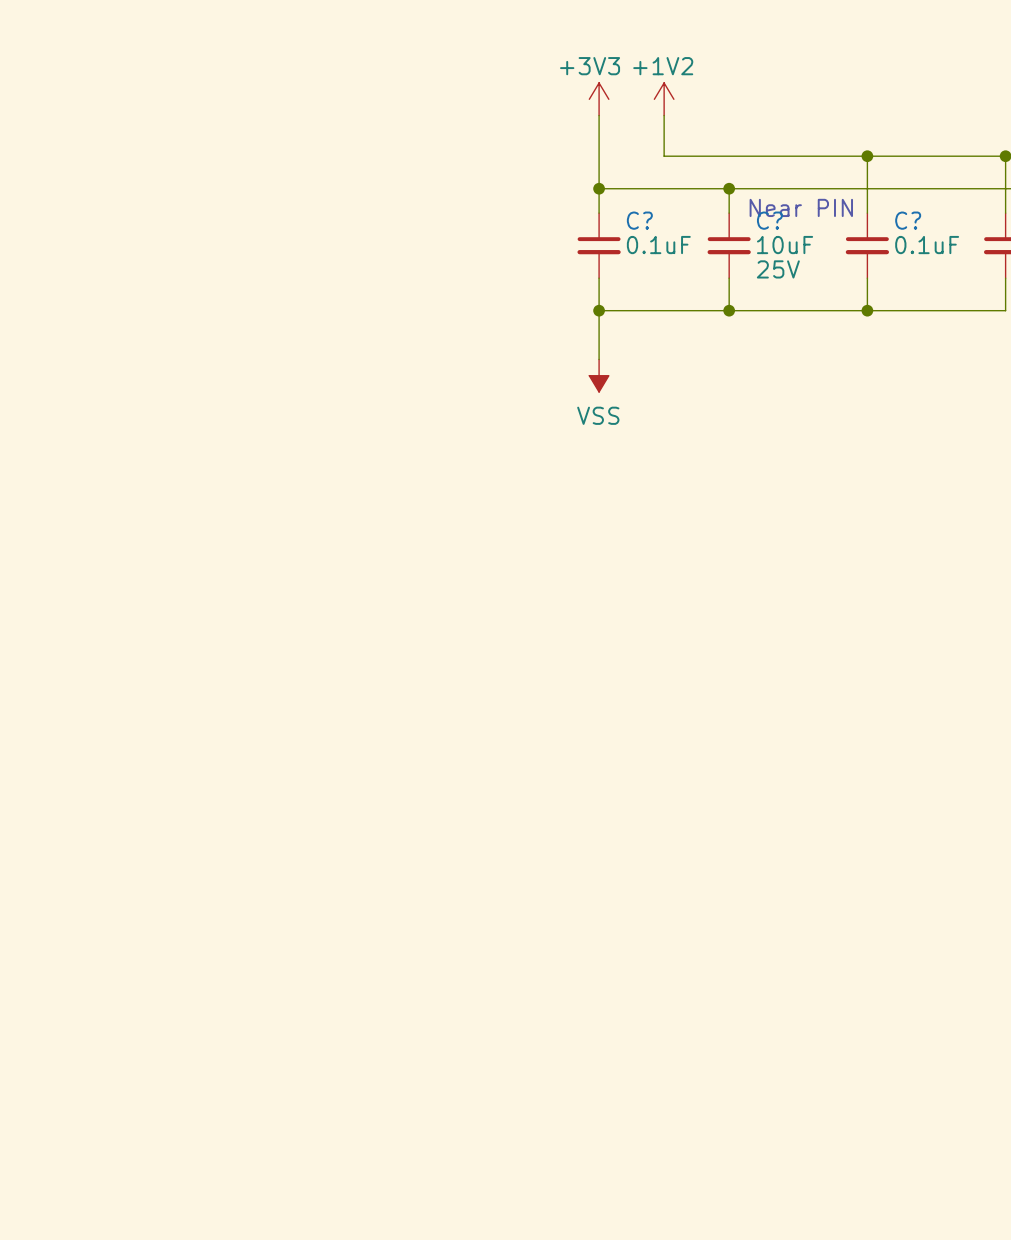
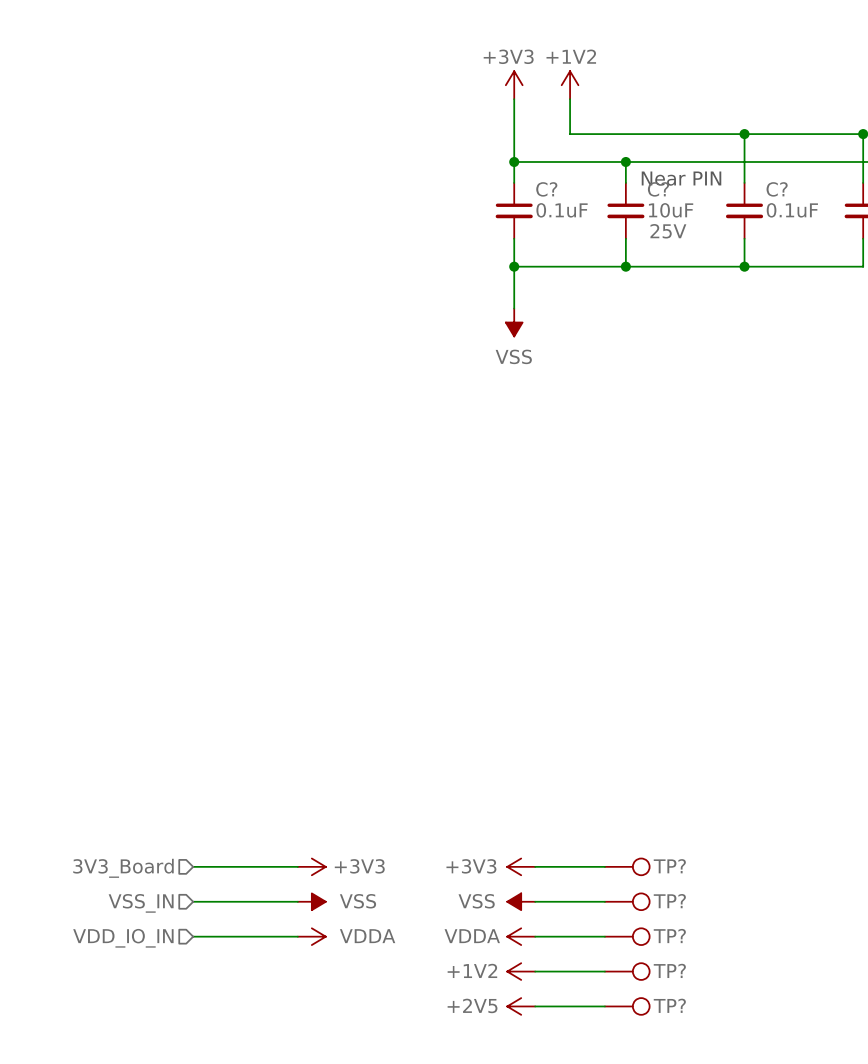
wire: none -> (193, 866) (297, 866)
power symbol: none -> +3V3 (311, 866)
power symbol: none -> +3V3 (521, 866)
wire: none -> (535, 866) (604, 866)
TP?: none -> (627, 866)
hierarchical label: none -> 3V3_Board (123, 868)
hierarchical label: none -> VSS_IN (141, 903)
wire: none -> (193, 901) (297, 901)
power symbol: none -> VSS (311, 901)
power symbol: none -> VSS (521, 901)
wire: none -> (535, 901) (604, 901)
TP?: none -> (627, 901)
hierarchical label: none -> VDD_IO_IN (123, 938)
wire: none -> (193, 936) (297, 936)
power symbol: none -> VDDA (311, 936)
power symbol: none -> VDDA (521, 936)
wire: none -> (535, 936) (604, 936)
TP?: none -> (627, 936)
power symbol: none -> +1V2 (521, 971)
wire: none -> (535, 971) (604, 971)
TP?: none -> (627, 971)
power symbol: none -> +2V5 (521, 1006)
wire: none -> (535, 1006) (604, 1006)
TP?: none -> (627, 1006)

